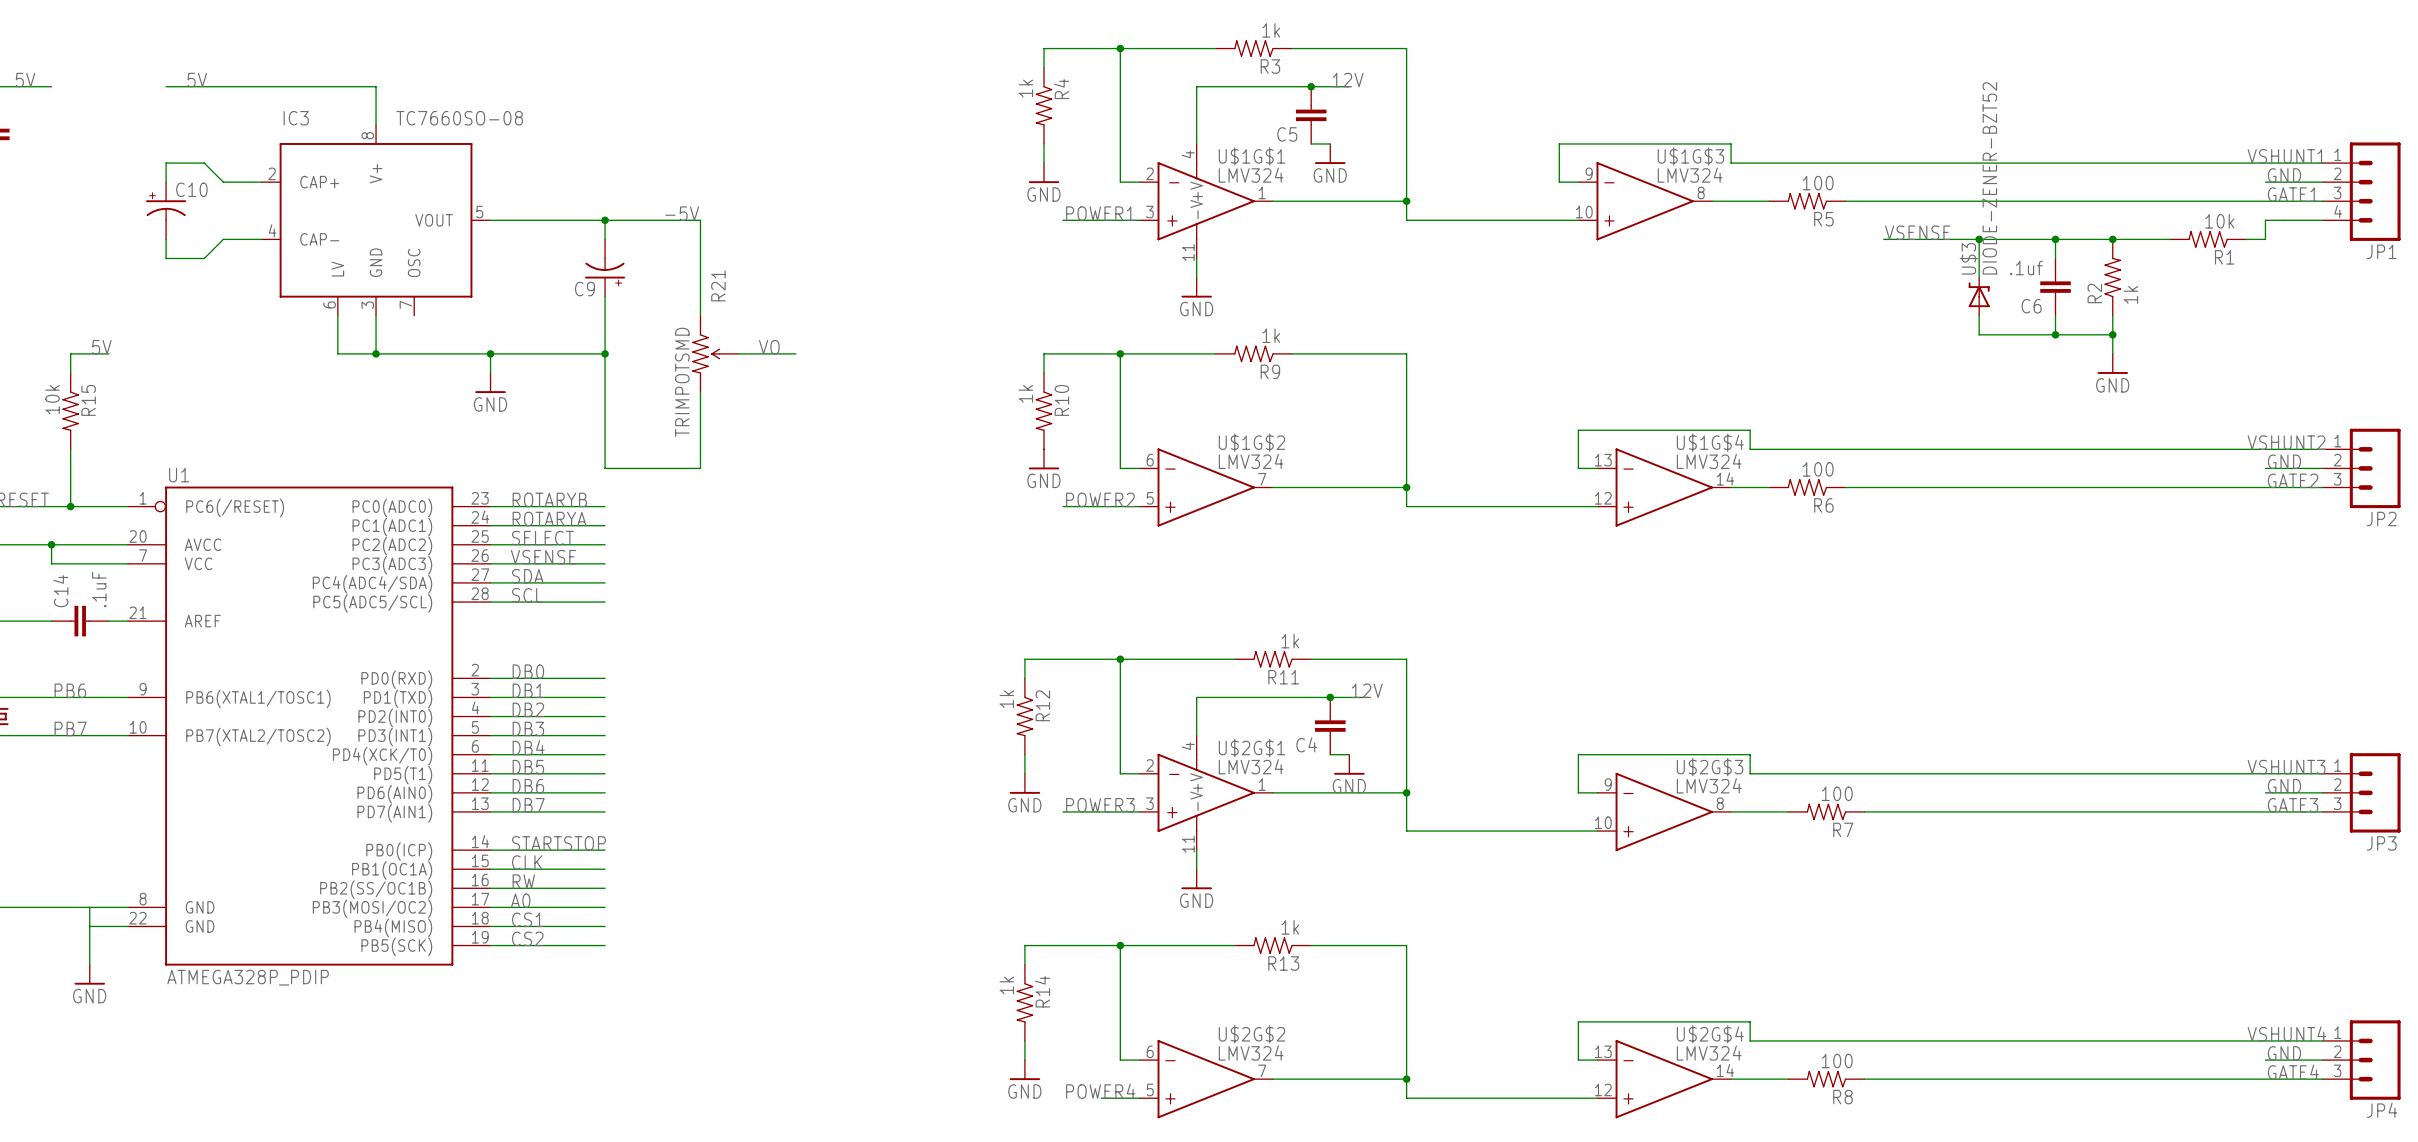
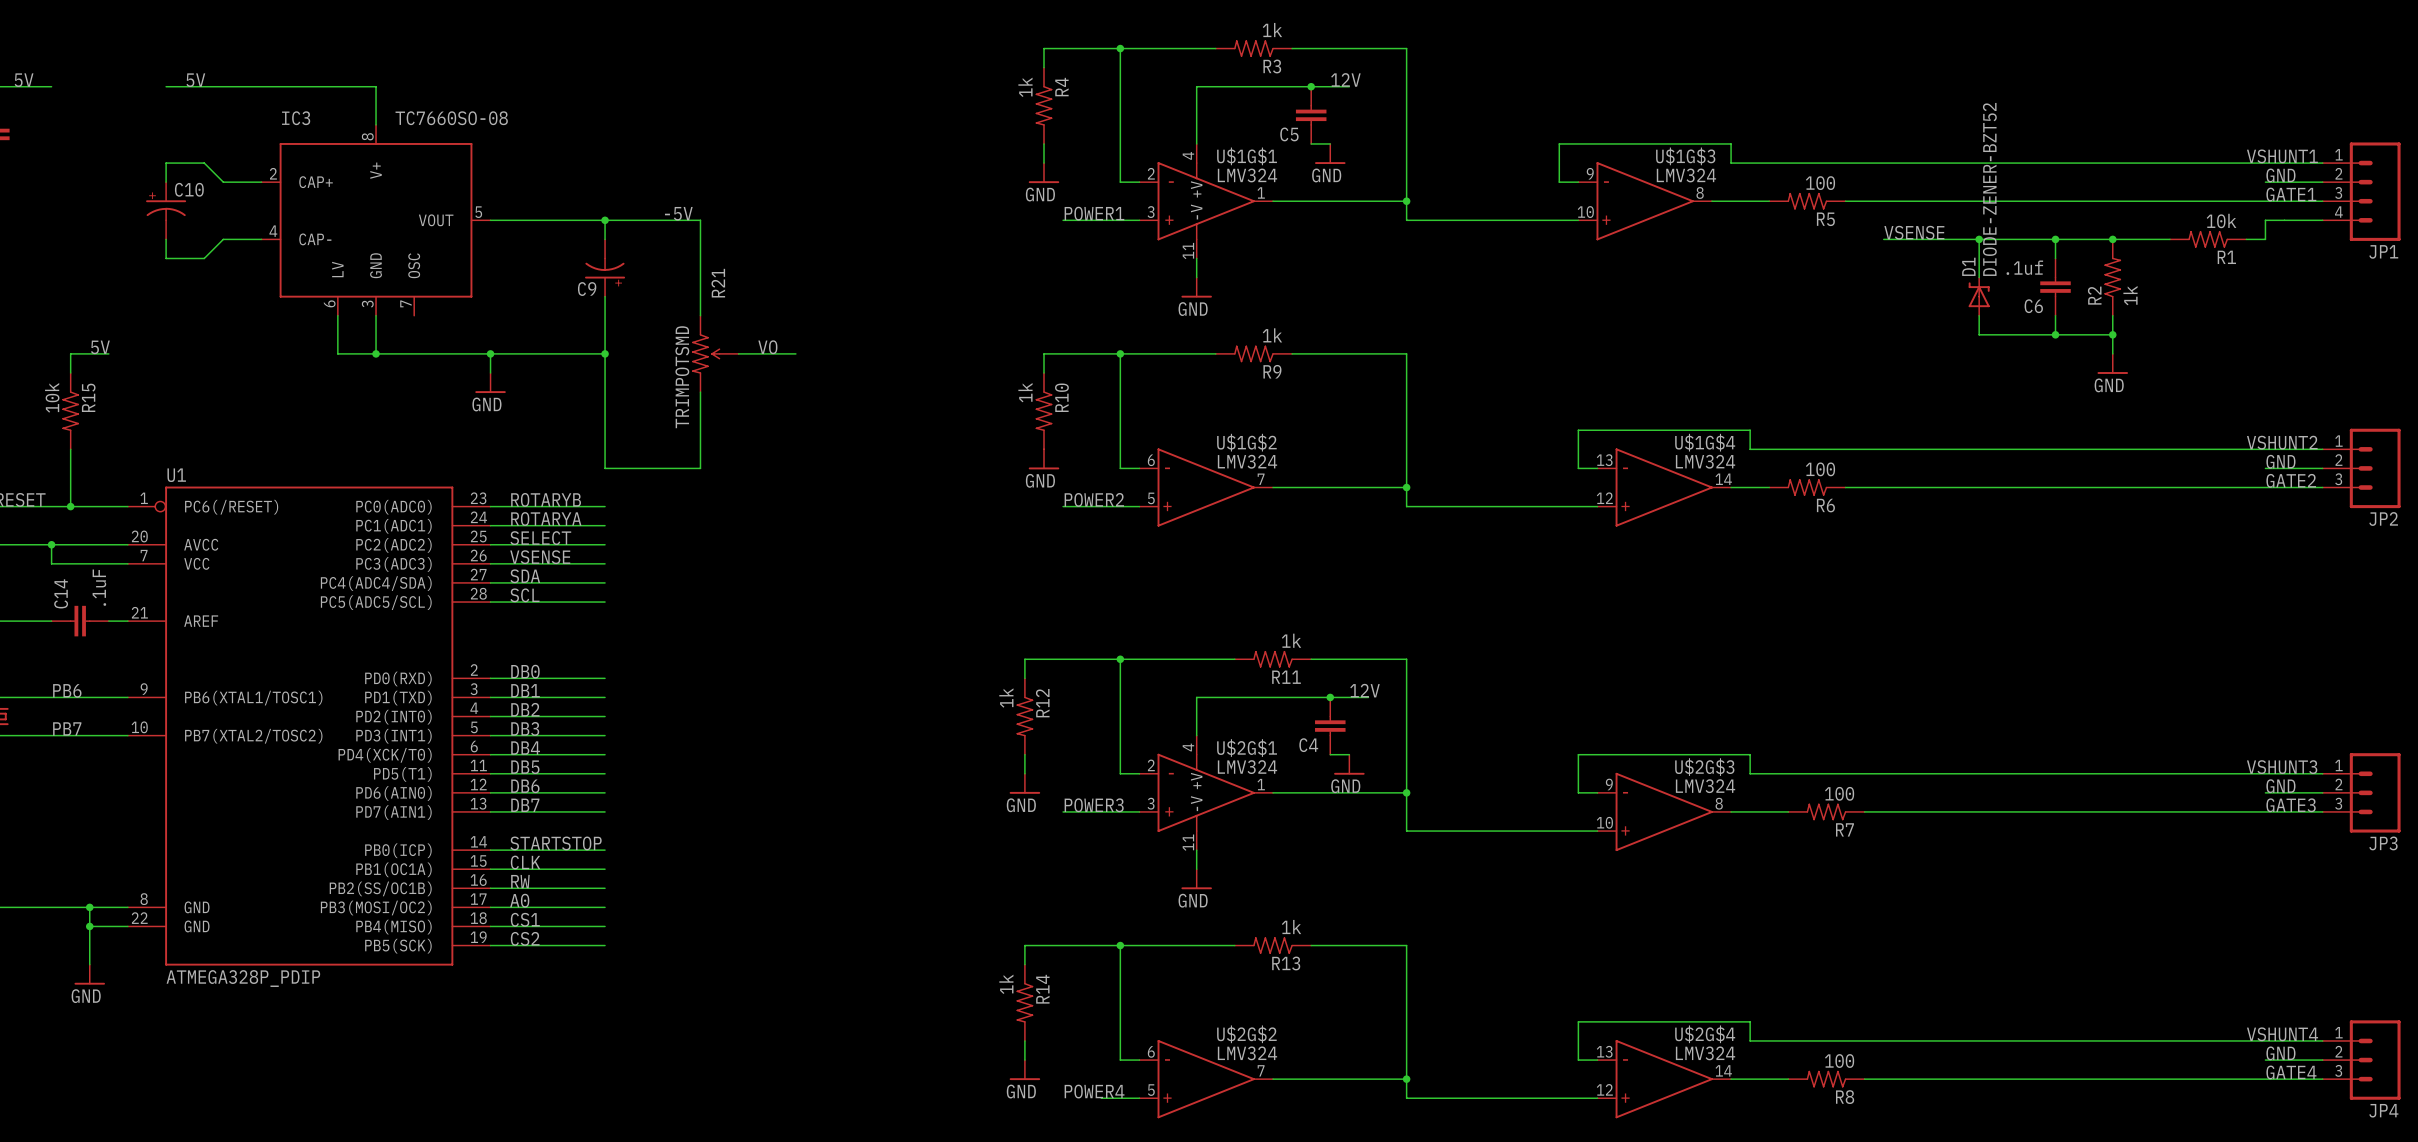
U$3 name: U$3 (1968, 258) -> D1 (1968, 266)
junction: none -> (89, 907)
junction: none -> (89, 926)

